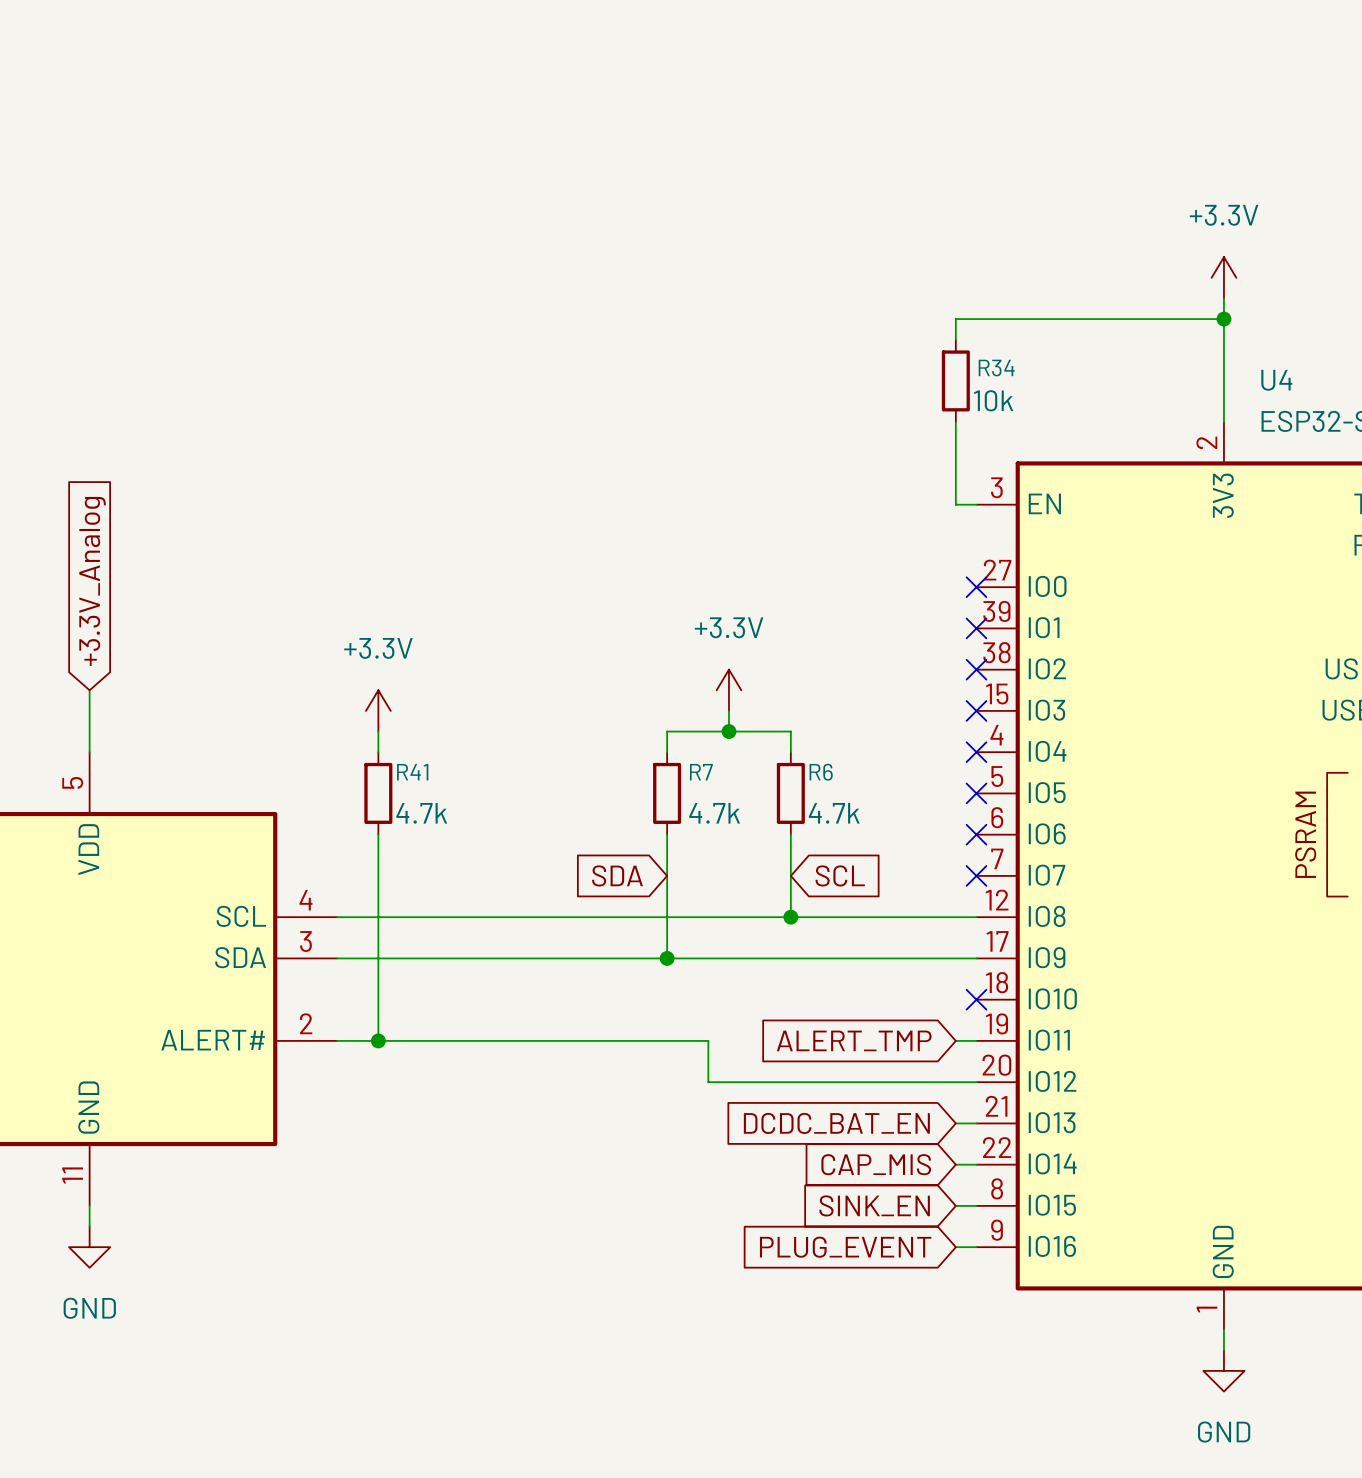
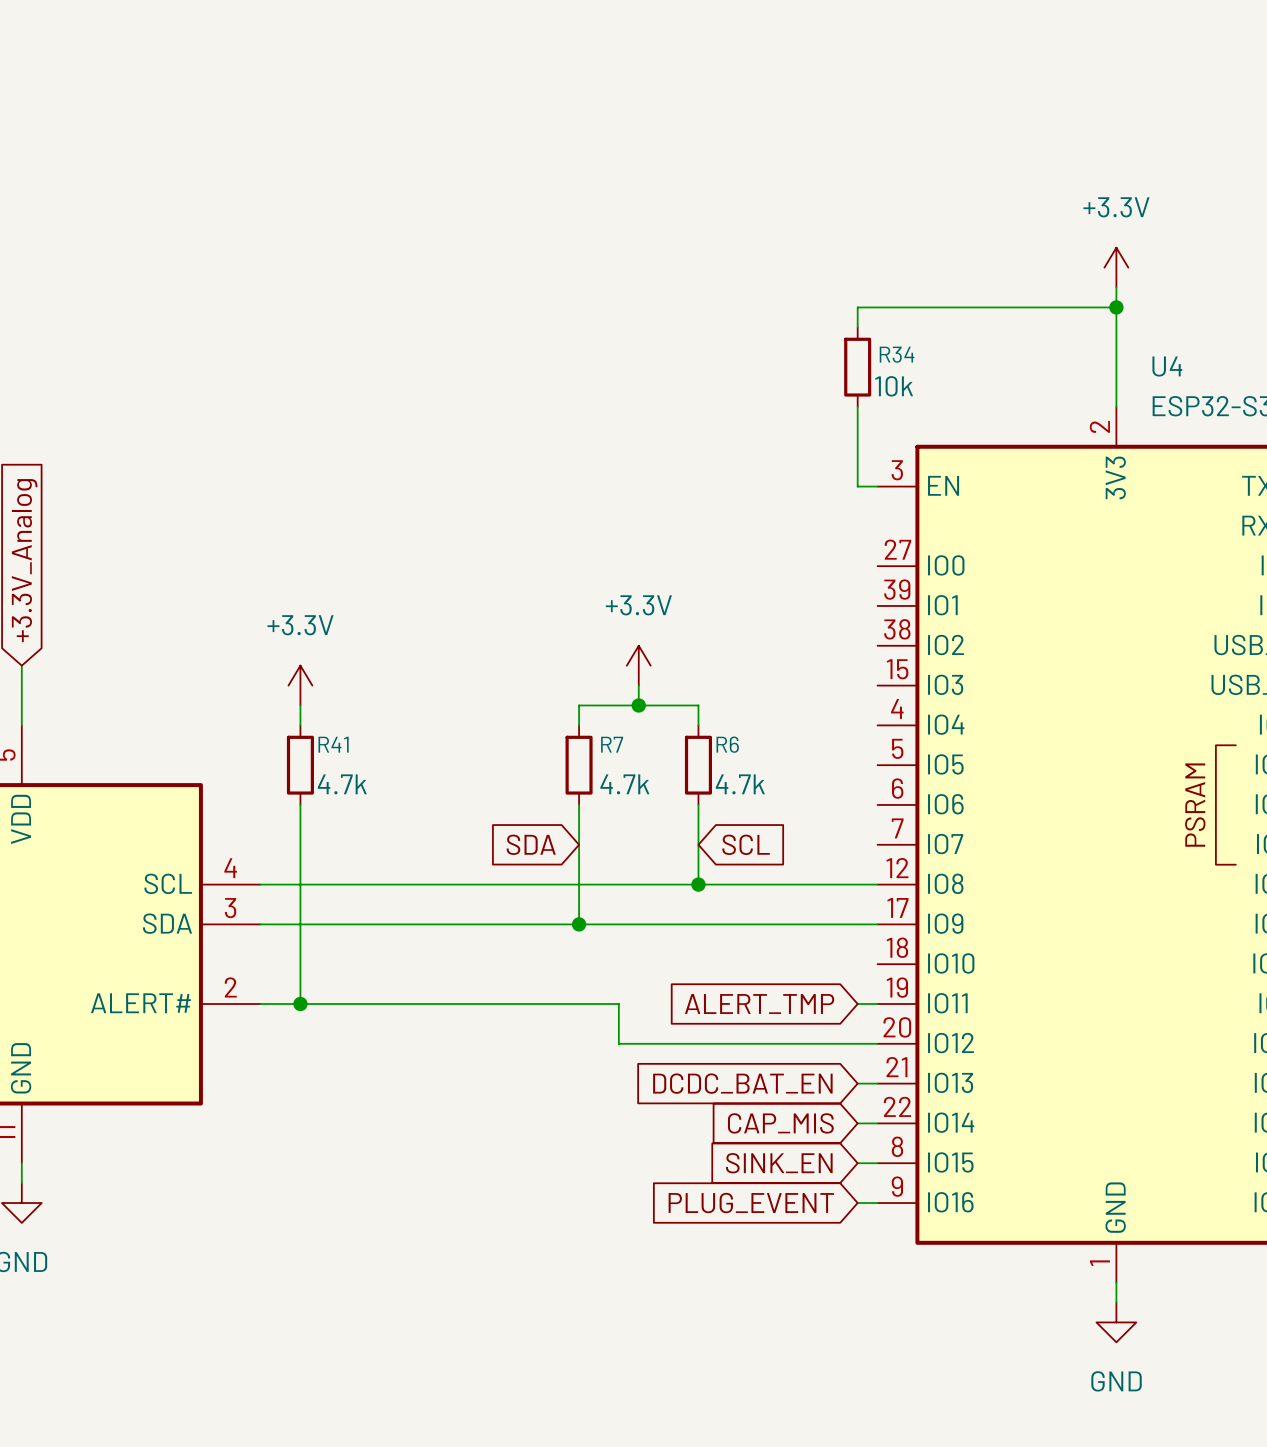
no-connect mark: (976, 587) -> none
no-connect mark: (976, 628) -> none
no-connect mark: (976, 669) -> none
no-connect mark: (976, 710) -> none
no-connect mark: (976, 752) -> none
no-connect mark: (976, 793) -> none
no-connect mark: (976, 834) -> none
no-connect mark: (976, 875) -> none
no-connect mark: (976, 999) -> none

